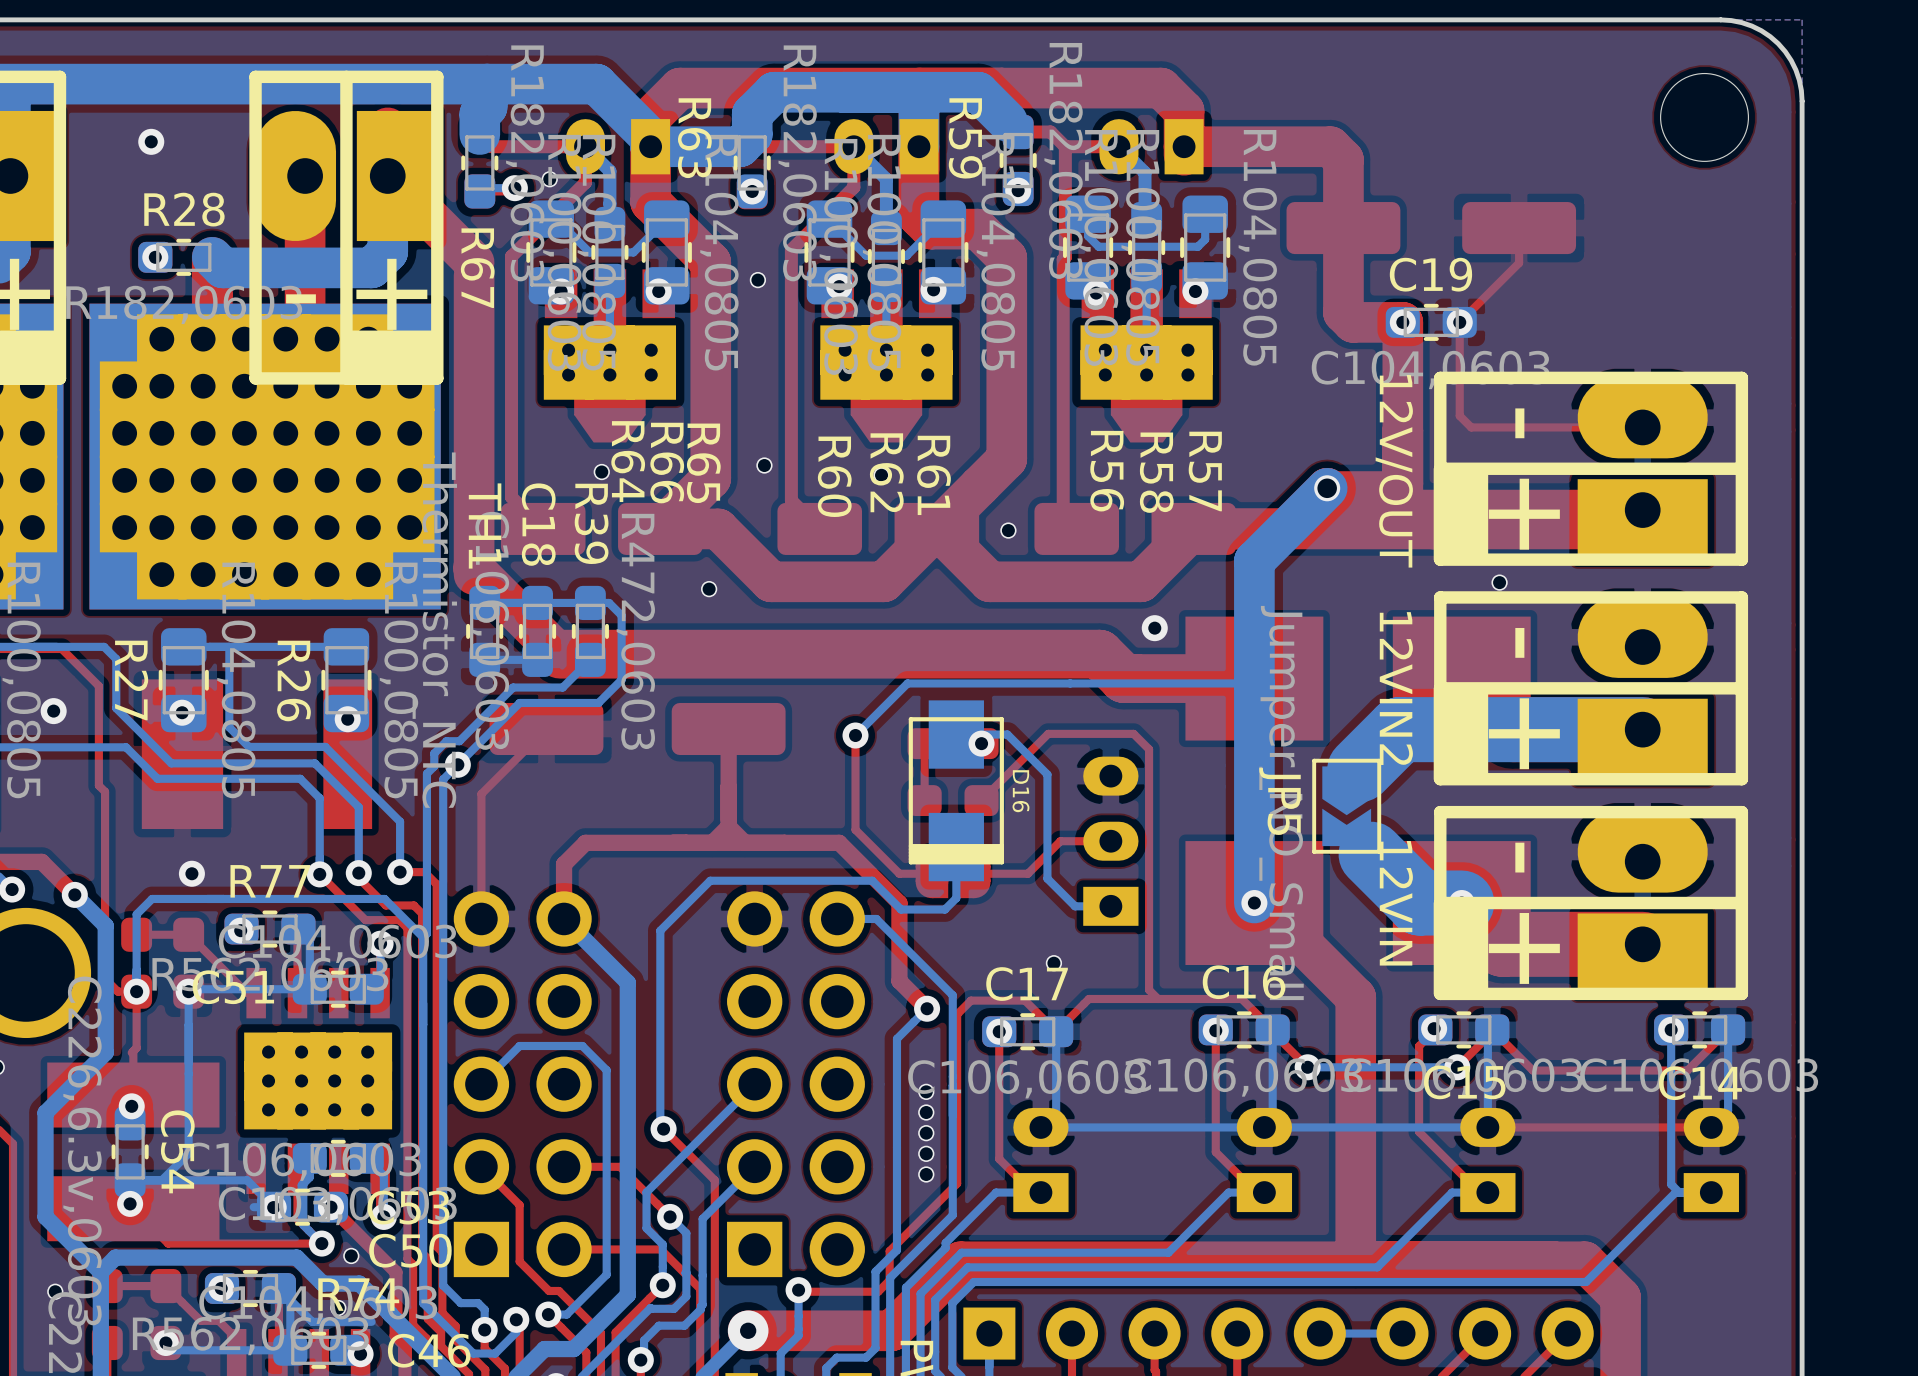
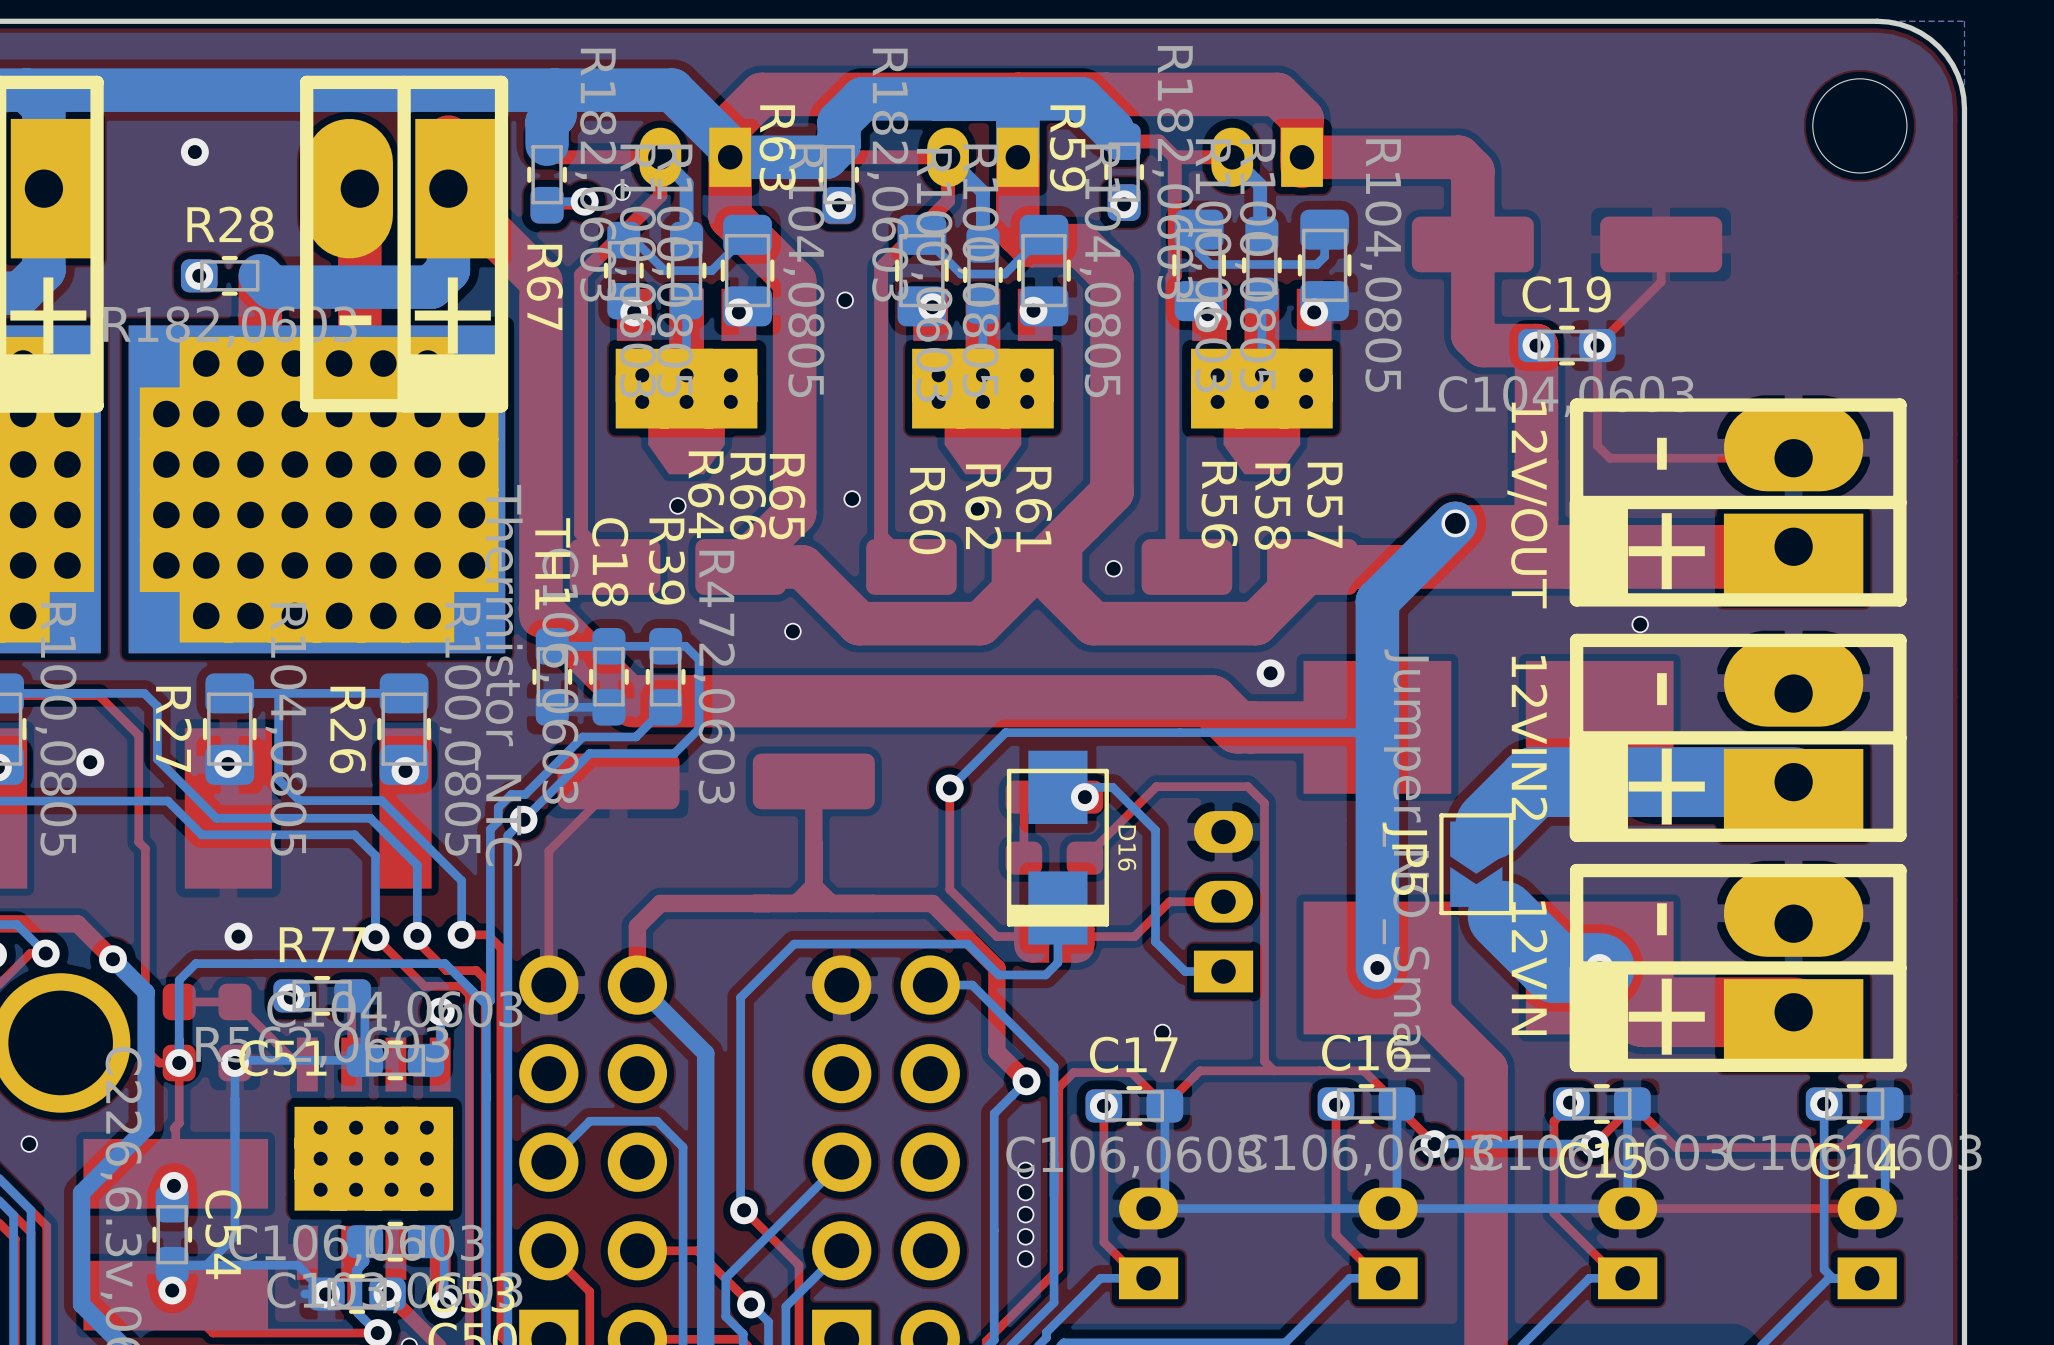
R64 footprint: [526, 200, 577, 305] -> [603, 221, 644, 320]

